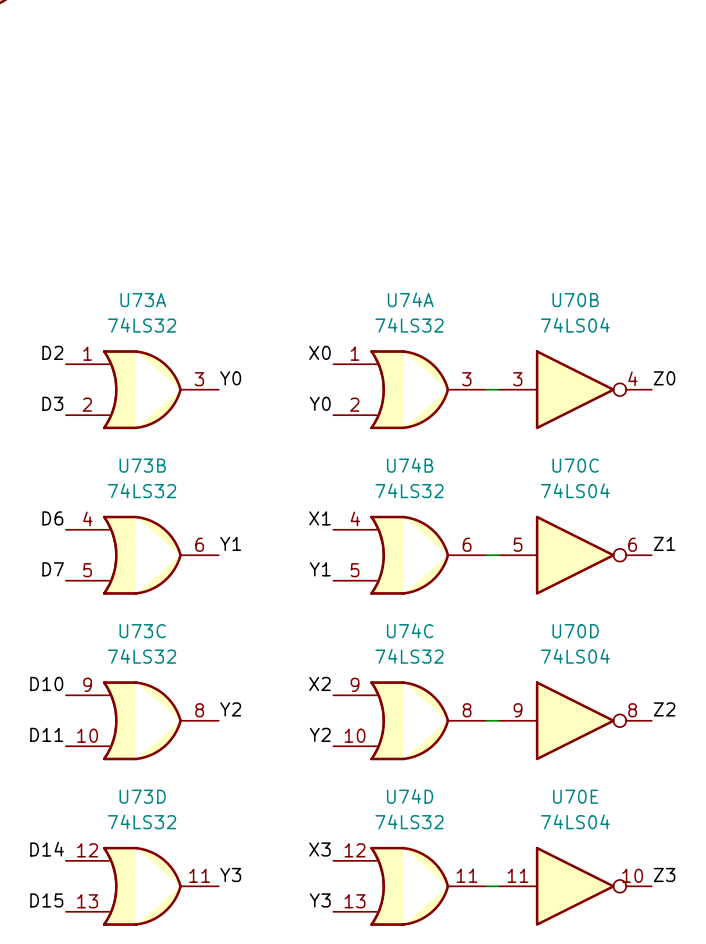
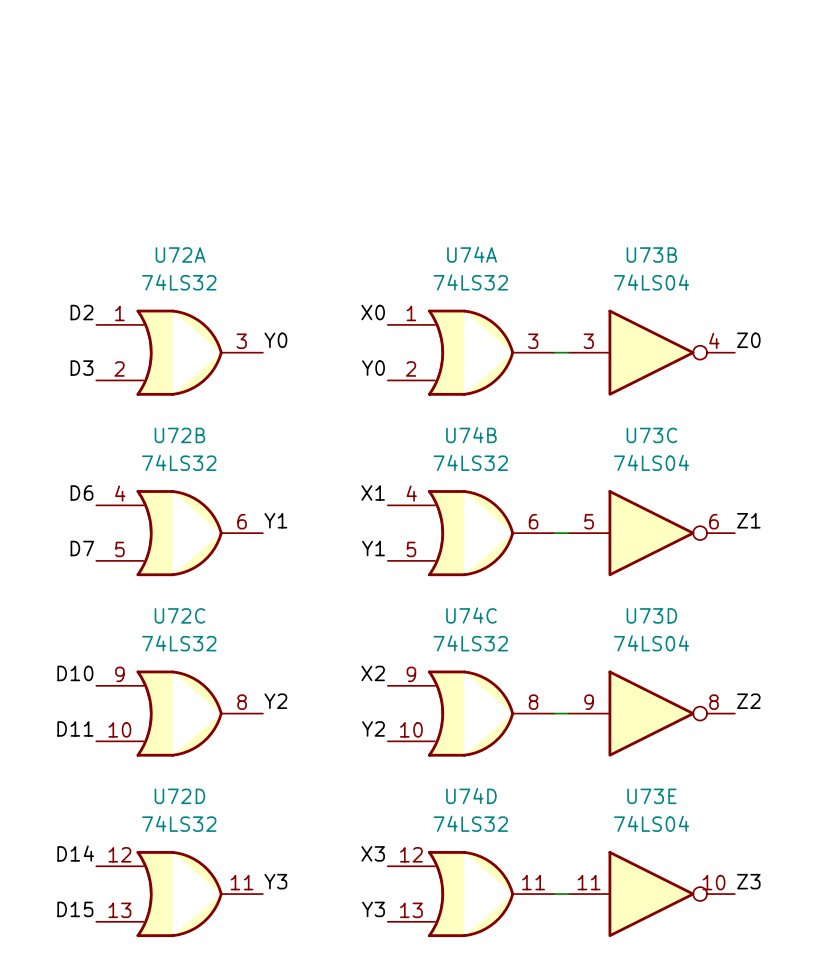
U73A name: U73A (143, 300) -> U72A (180, 254)
U70B name: U70B (575, 300) -> U73B (651, 254)
U73B name: U73B (142, 465) -> U72B (179, 435)
U70C name: U70C (575, 465) -> U73C (651, 435)
U73C name: U73C (142, 631) -> U72C (179, 615)
U70D name: U70D (575, 631) -> U73D (651, 615)
U73D name: U73D (142, 796) -> U72D (179, 796)
U70E name: U70E (575, 796) -> U73E (651, 796)

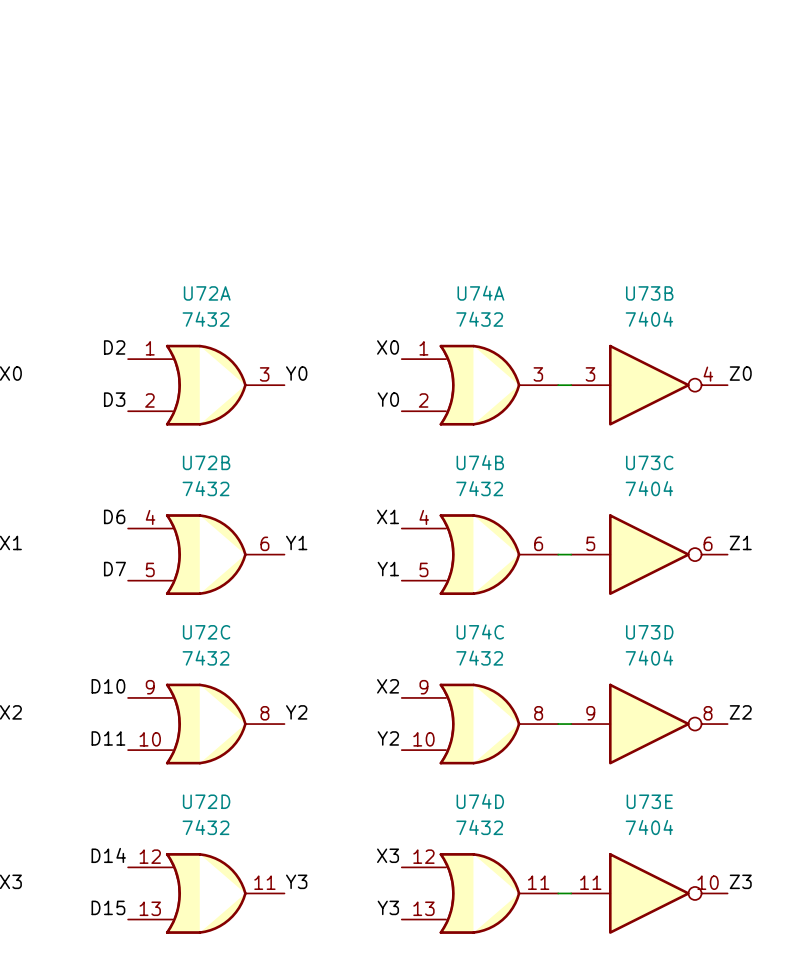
U72A value: 74LS32 (179, 282) -> 7432 (205, 319)
U74A value: 74LS32 (470, 282) -> 7432 (479, 319)
U73B value: 74LS04 (651, 282) -> 7404 (649, 319)
U72B value: 74LS32 (179, 462) -> 7432 (205, 488)
U74B value: 74LS32 (470, 462) -> 7432 (479, 488)
U73C value: 74LS04 (651, 462) -> 7404 (649, 488)
U72C value: 74LS32 (179, 643) -> 7432 (205, 658)
U74C value: 74LS32 (470, 643) -> 7432 (479, 658)
U73D value: 74LS04 (651, 643) -> 7404 (649, 658)
U72D value: 74LS32 (179, 823) -> 7432 (205, 827)
U74D value: 74LS32 (470, 823) -> 7432 (479, 827)
U73E value: 74LS04 (651, 823) -> 7404 (649, 827)

